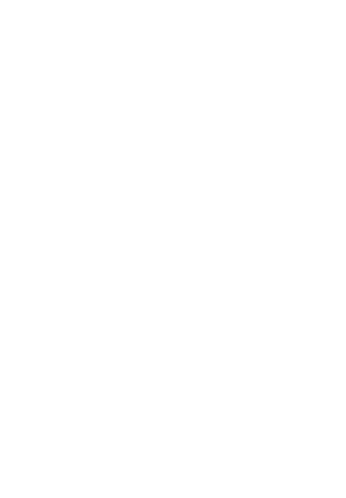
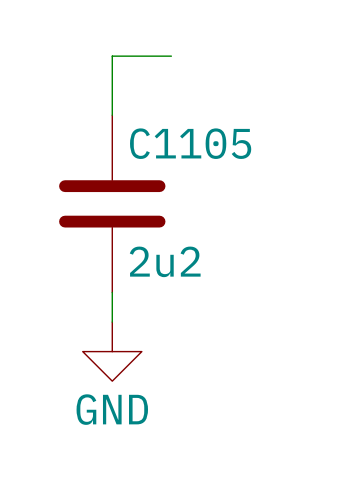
wire: none -> (171, 56) (112, 56) (112, 115)
C1105: none -> 2u2 (112, 203)
wire: none -> (112, 292) (112, 322)
power symbol: none -> GND (112, 351)

